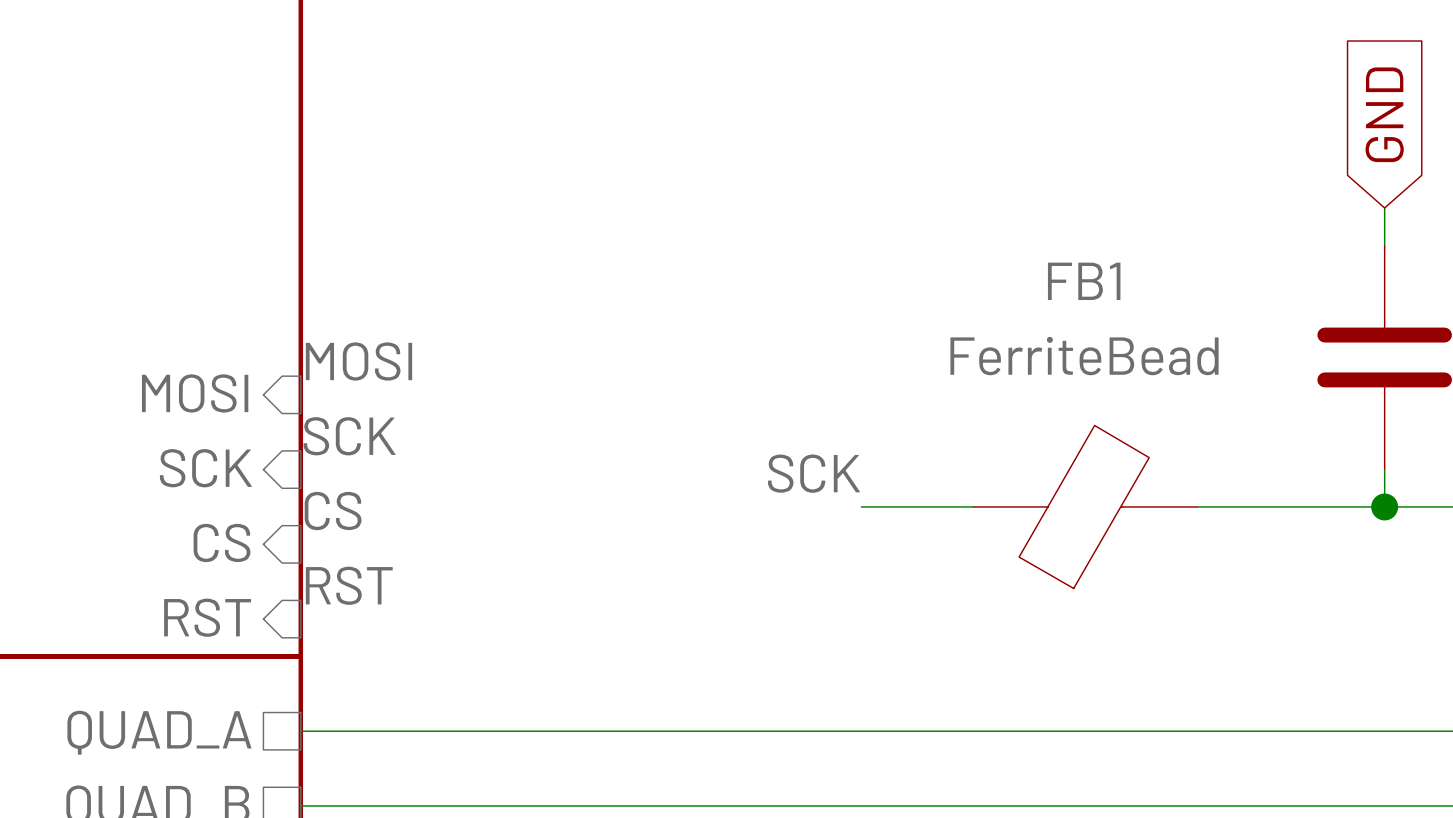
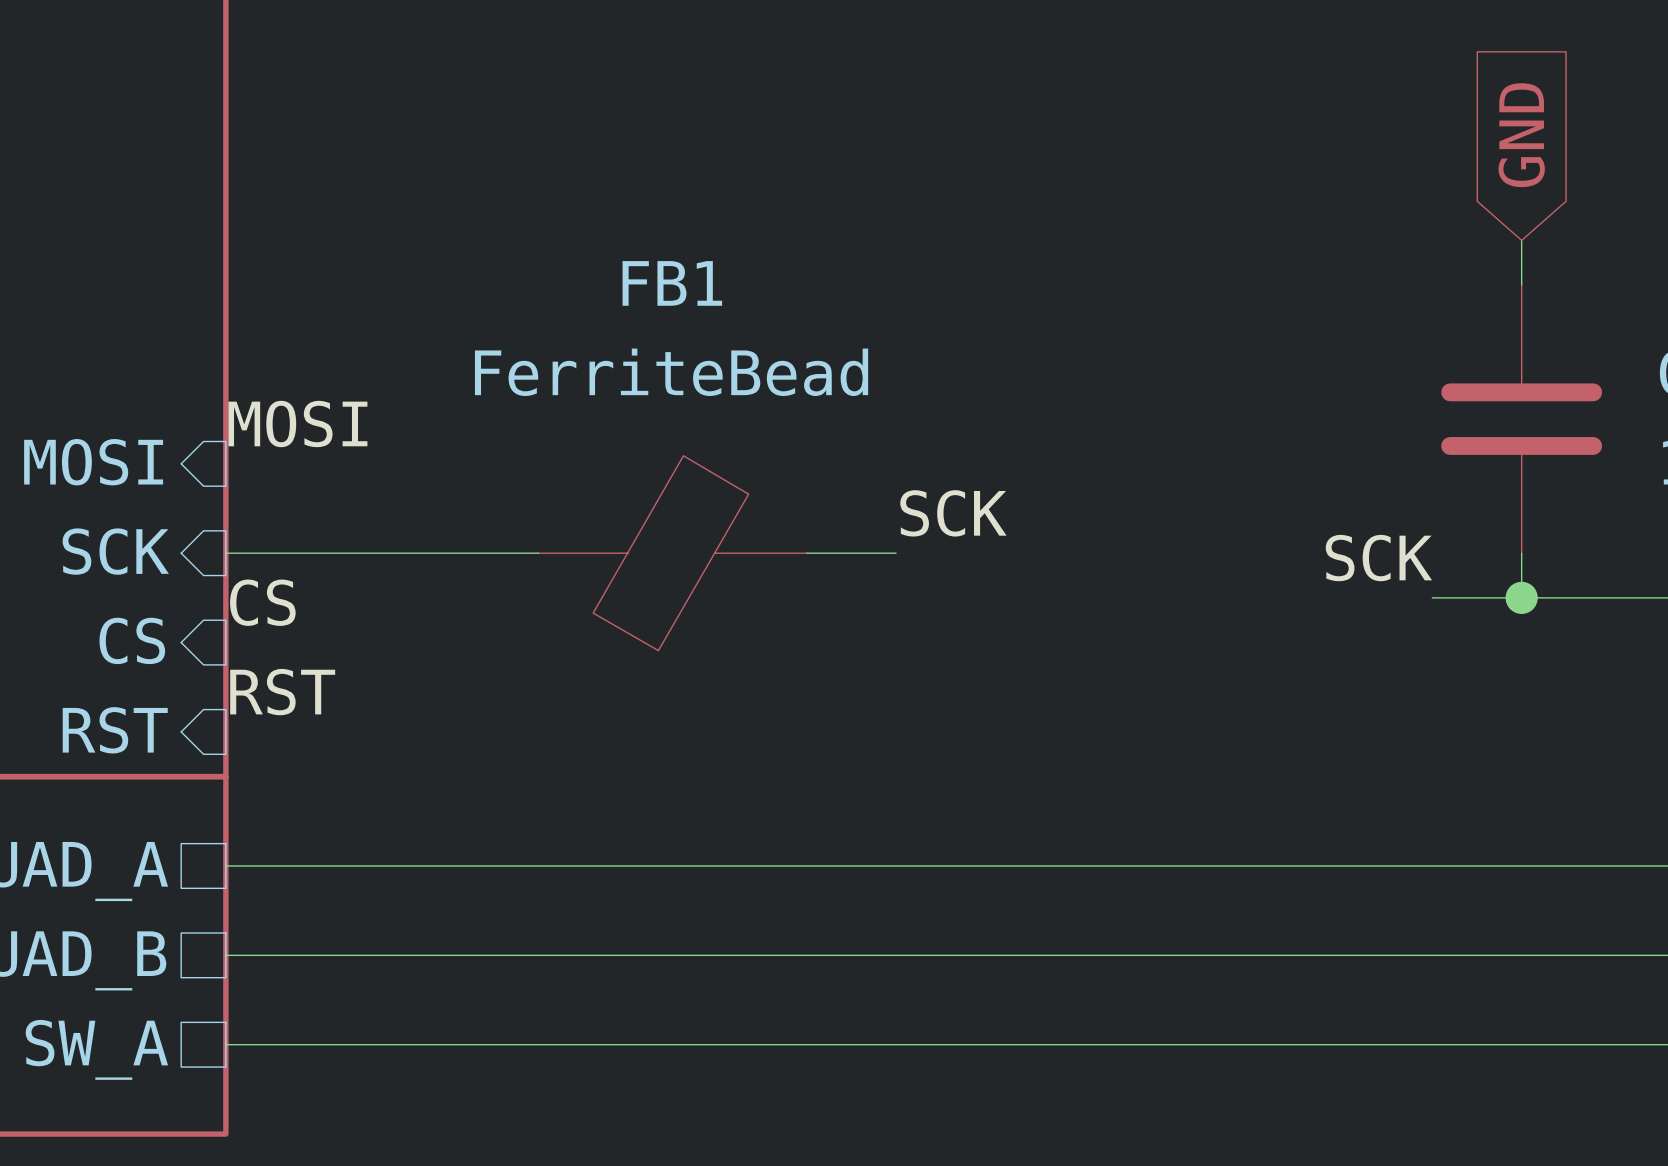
label: SCK (349, 436) -> none
wire: none -> (225, 553) (538, 553)
wire: none -> (806, 553) (896, 553)
label position: SCK (813, 473) -> SCK (953, 513)
label: none -> SCK (1378, 558)
wire: (861, 506) (973, 506) -> none
FB1 position: (1085, 506) -> (672, 553)
wire: (1197, 506) (1309, 506) -> none

